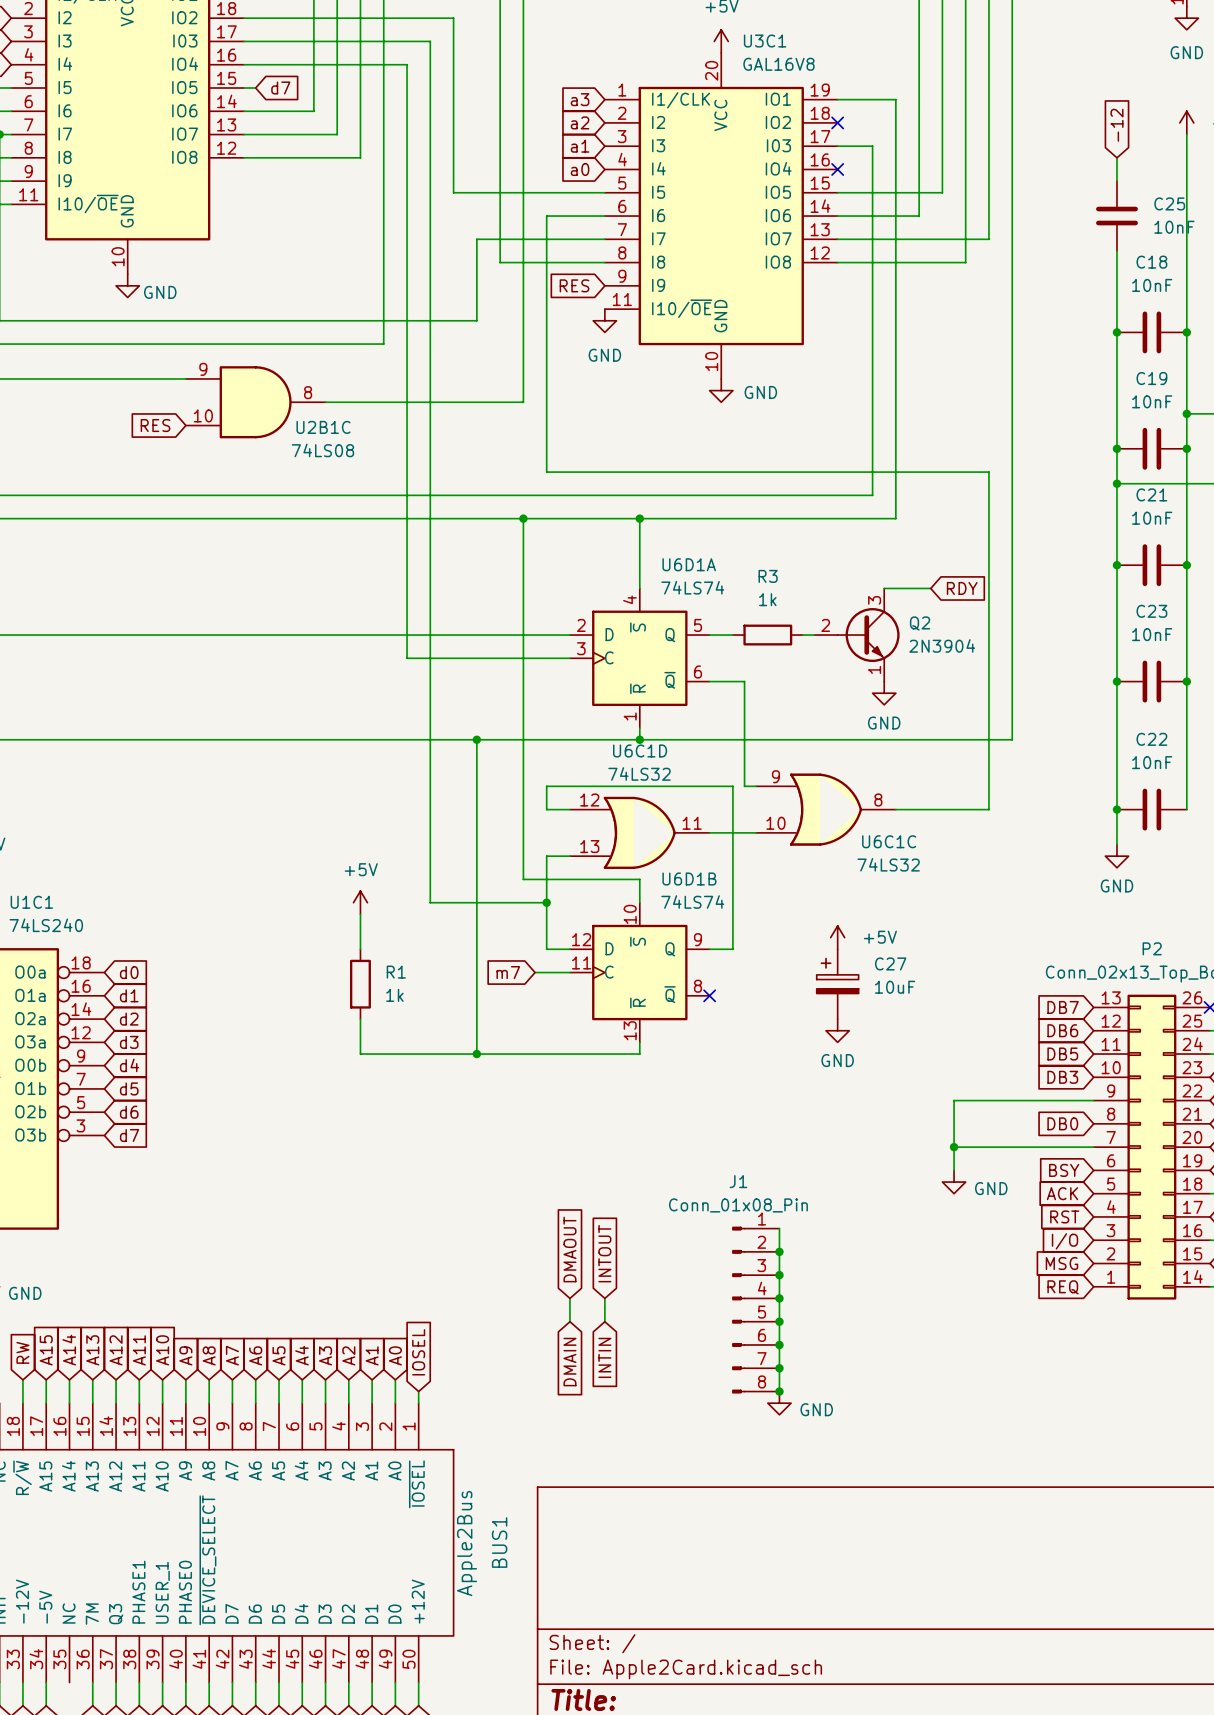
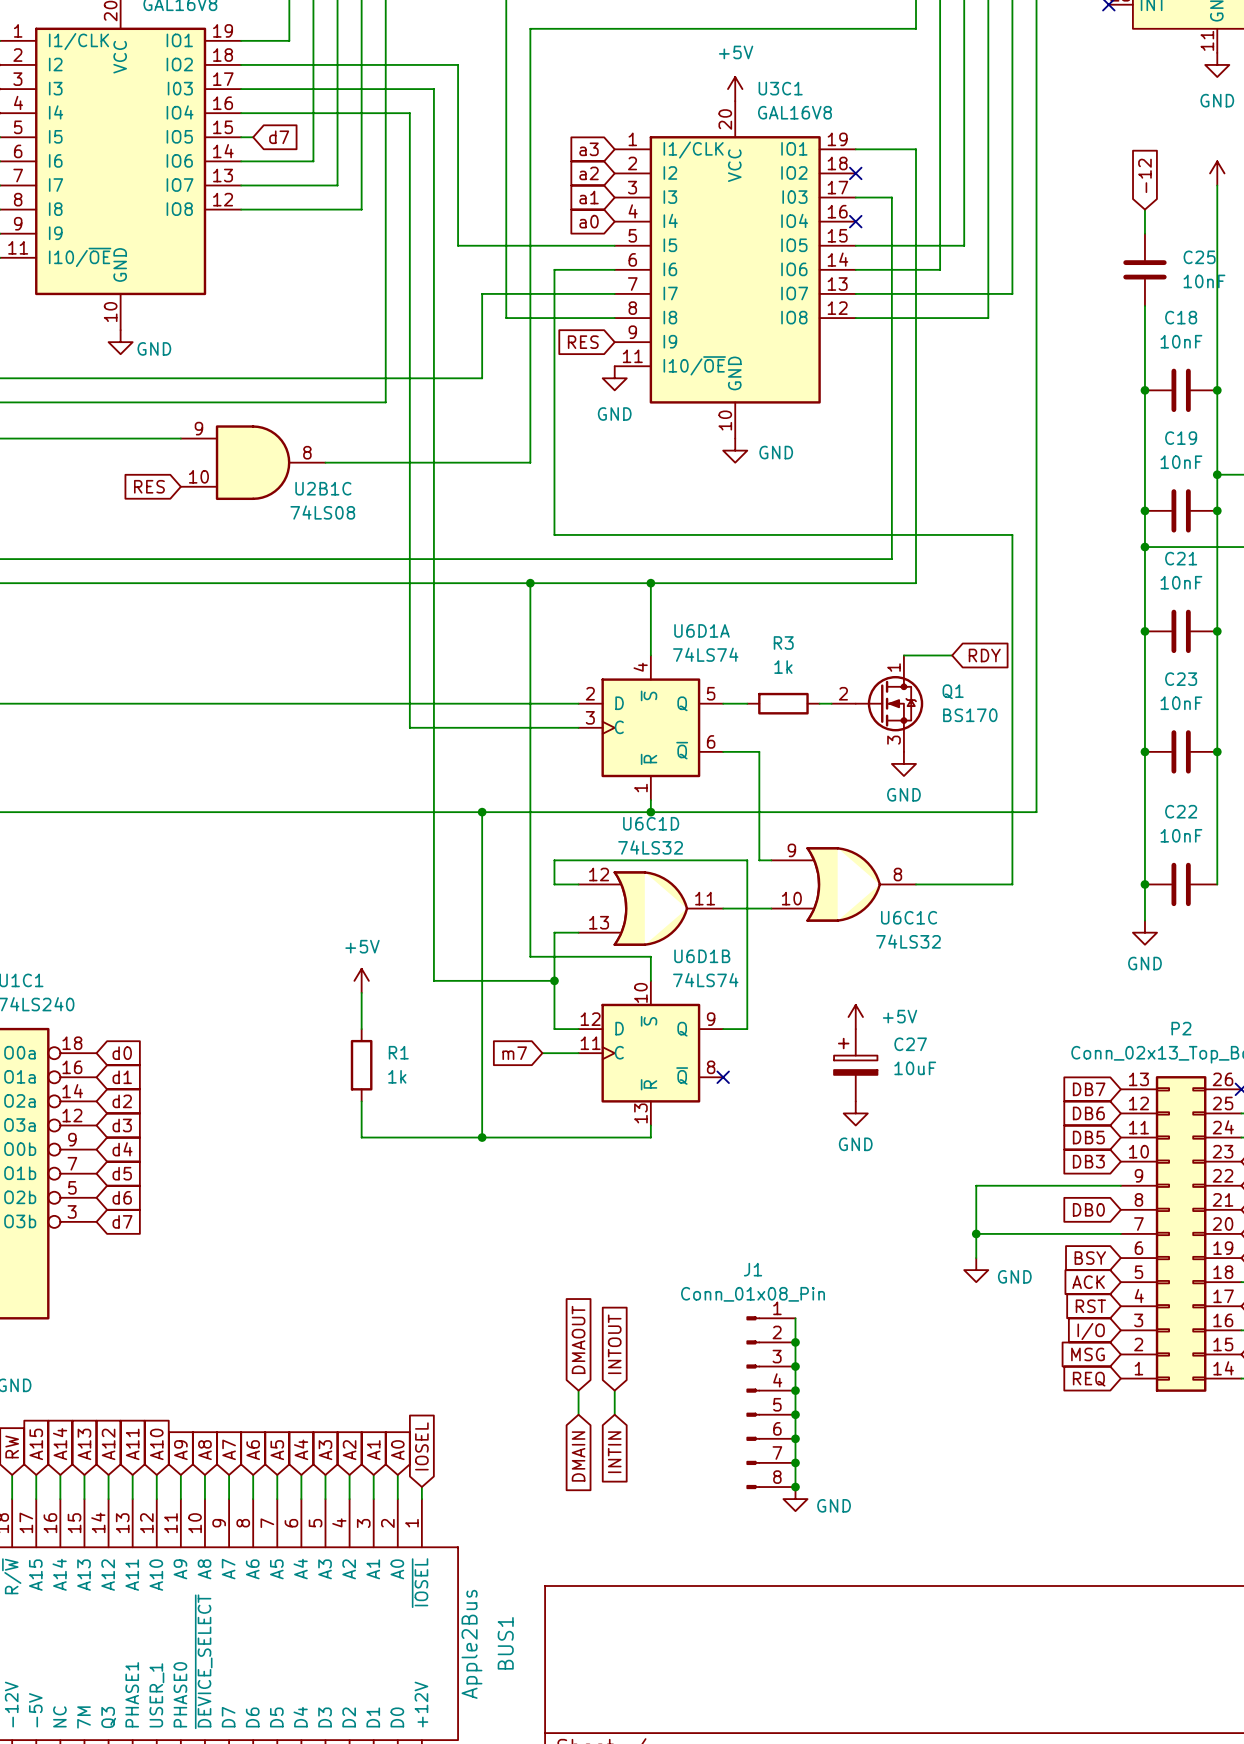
Q2: 2N3904 (856, 635) -> none
Q1: none -> BS170 (877, 703)

